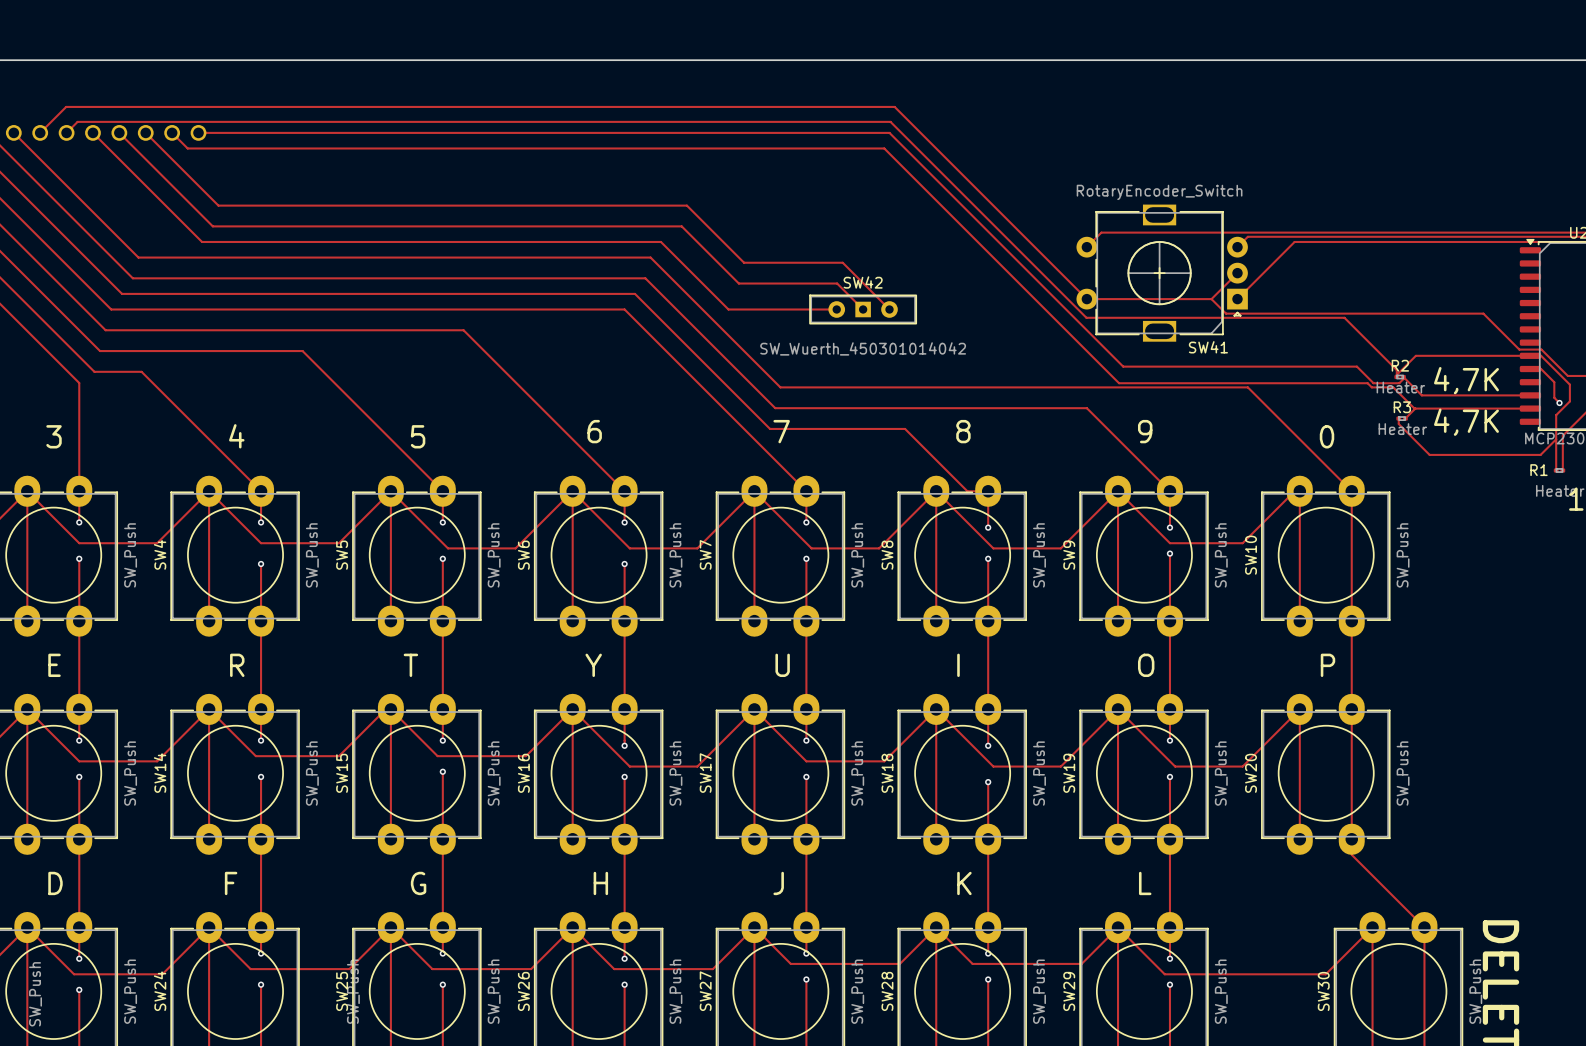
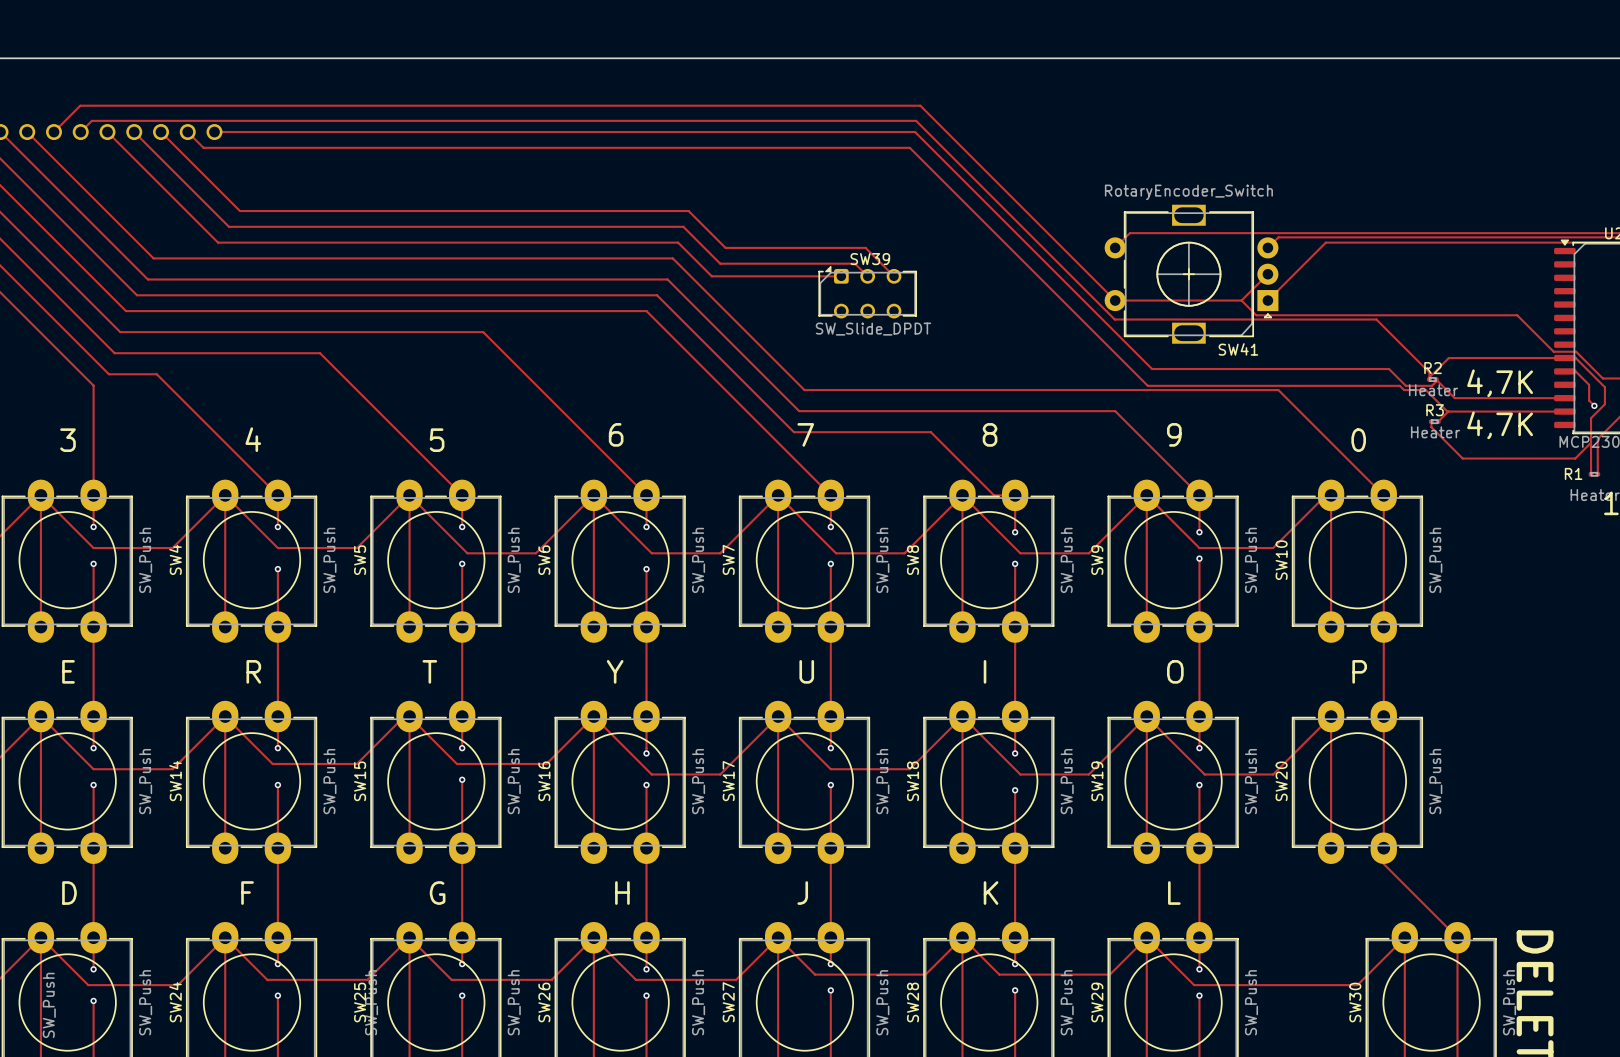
track: (218, 205) (686, 205) (744, 262) -> (234, 205) (239, 211) (688, 211) (704, 226)
track: (660, 226) (681, 226) -> (683, 226) (720, 263) (767, 263)
track: (655, 241) (660, 241) (728, 309) (836, 309) -> (678, 242) (711, 276) (841, 276)
track: (702, 247) (738, 283) (837, 283) (863, 309) -> (725, 247) (865, 247) (894, 276)
track: (830, 262) (842, 262) (889, 309) -> (855, 263) (867, 276)
SW39: none -> SW_Slide_DPDT (867, 292)
SW42: SW_Wuerth_450301014042 (863, 309) -> none

